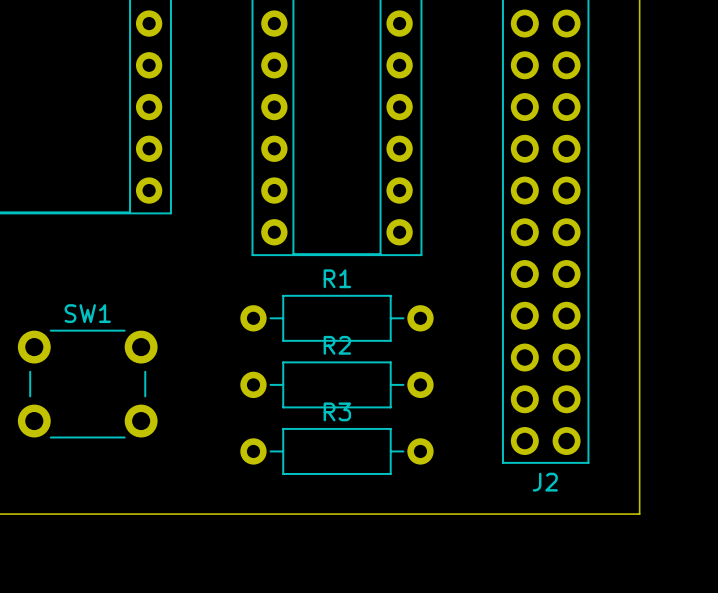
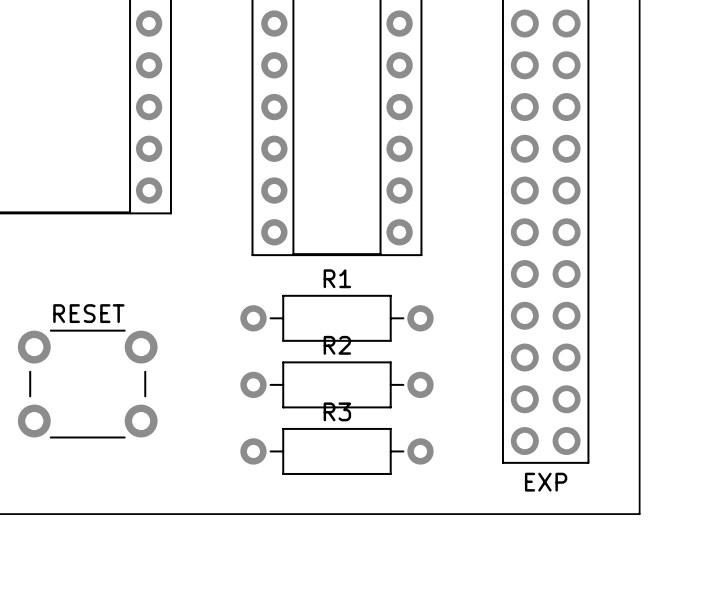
SW1 name: SW1 (87, 313) -> RESET (88, 313)
J2 name: J2 (545, 482) -> EXP (546, 482)

